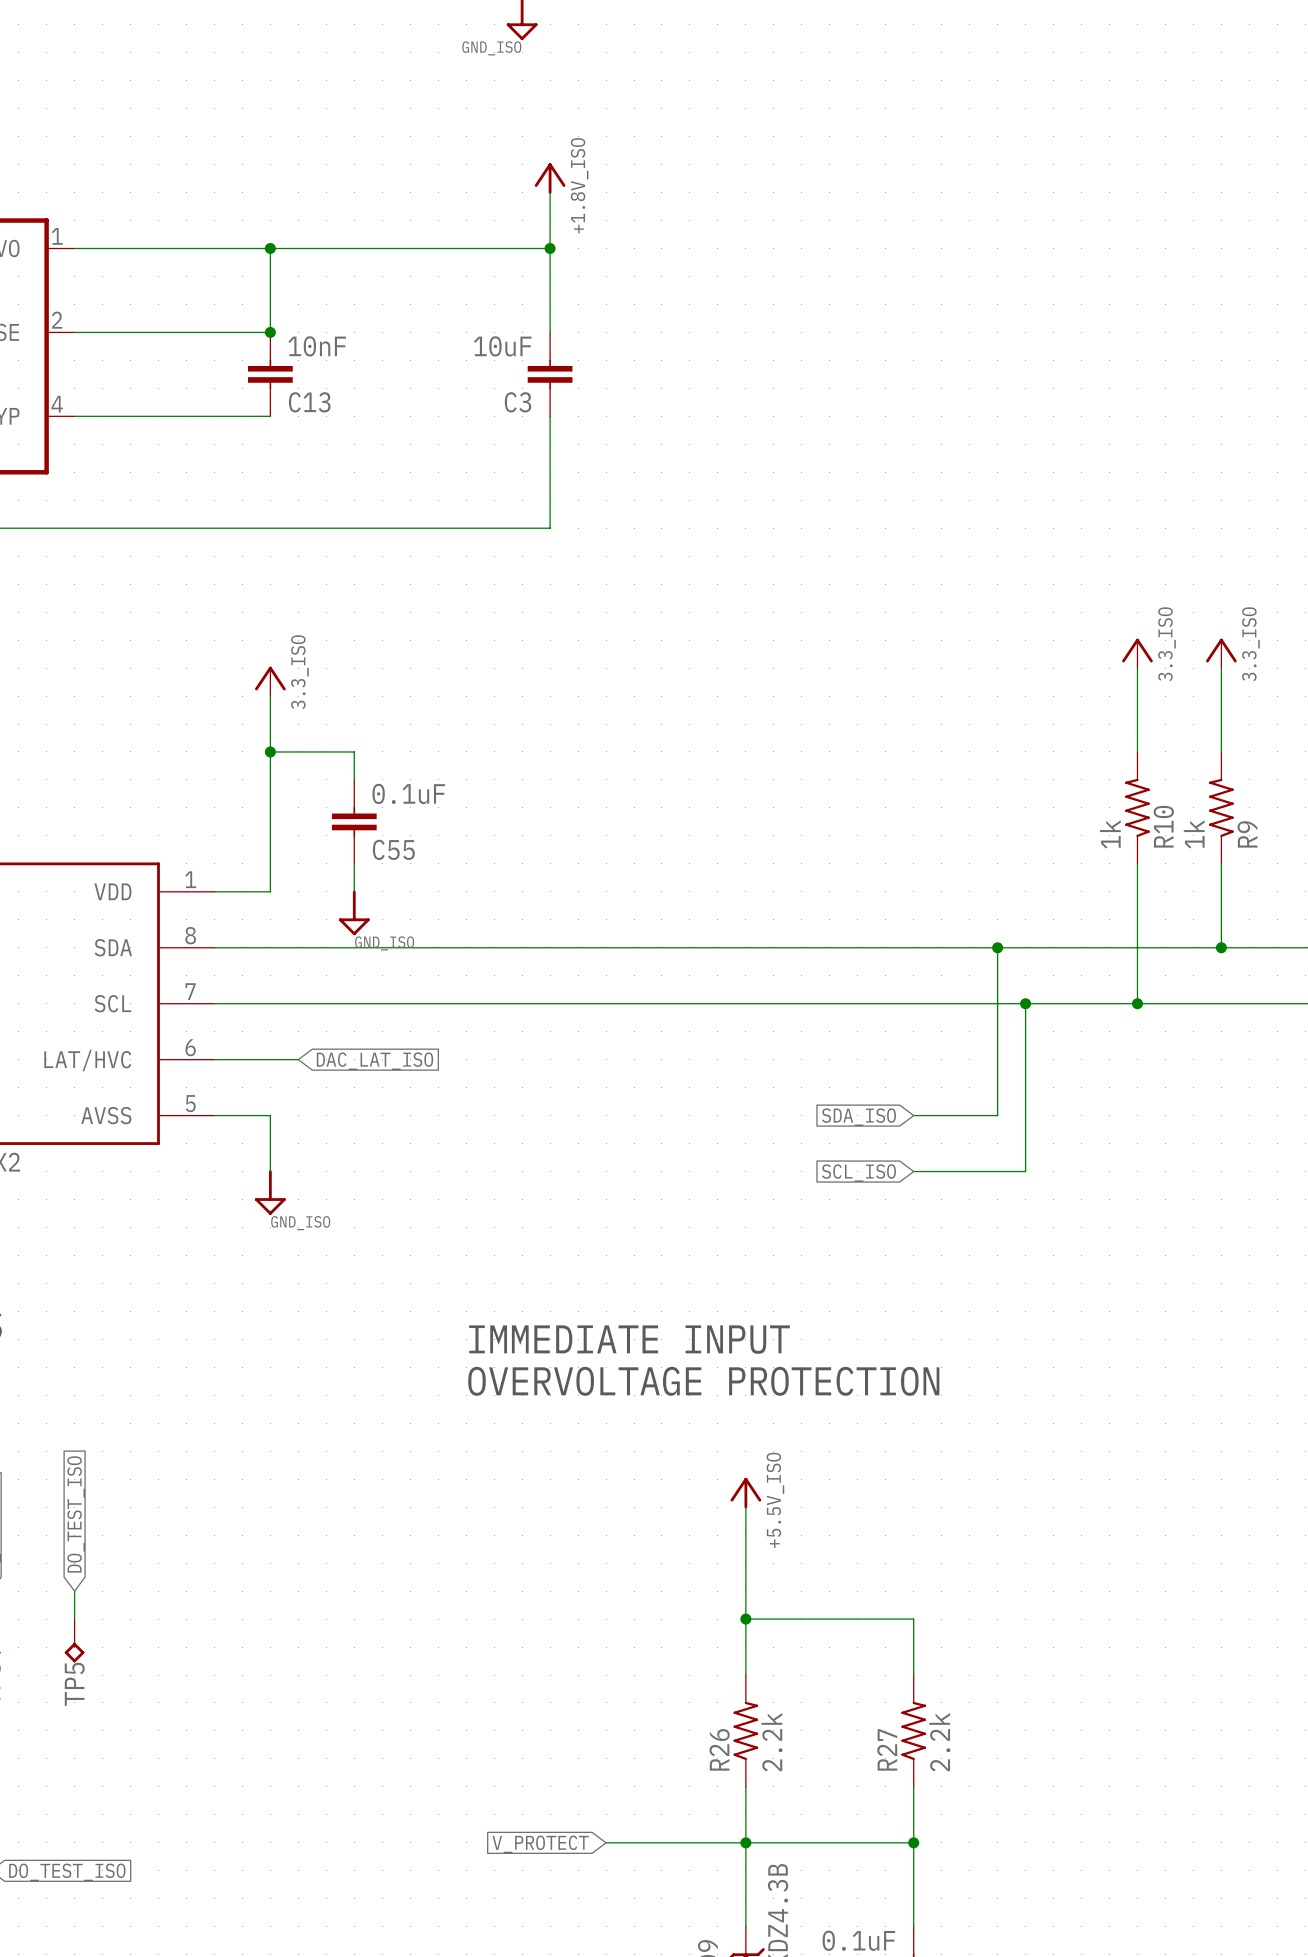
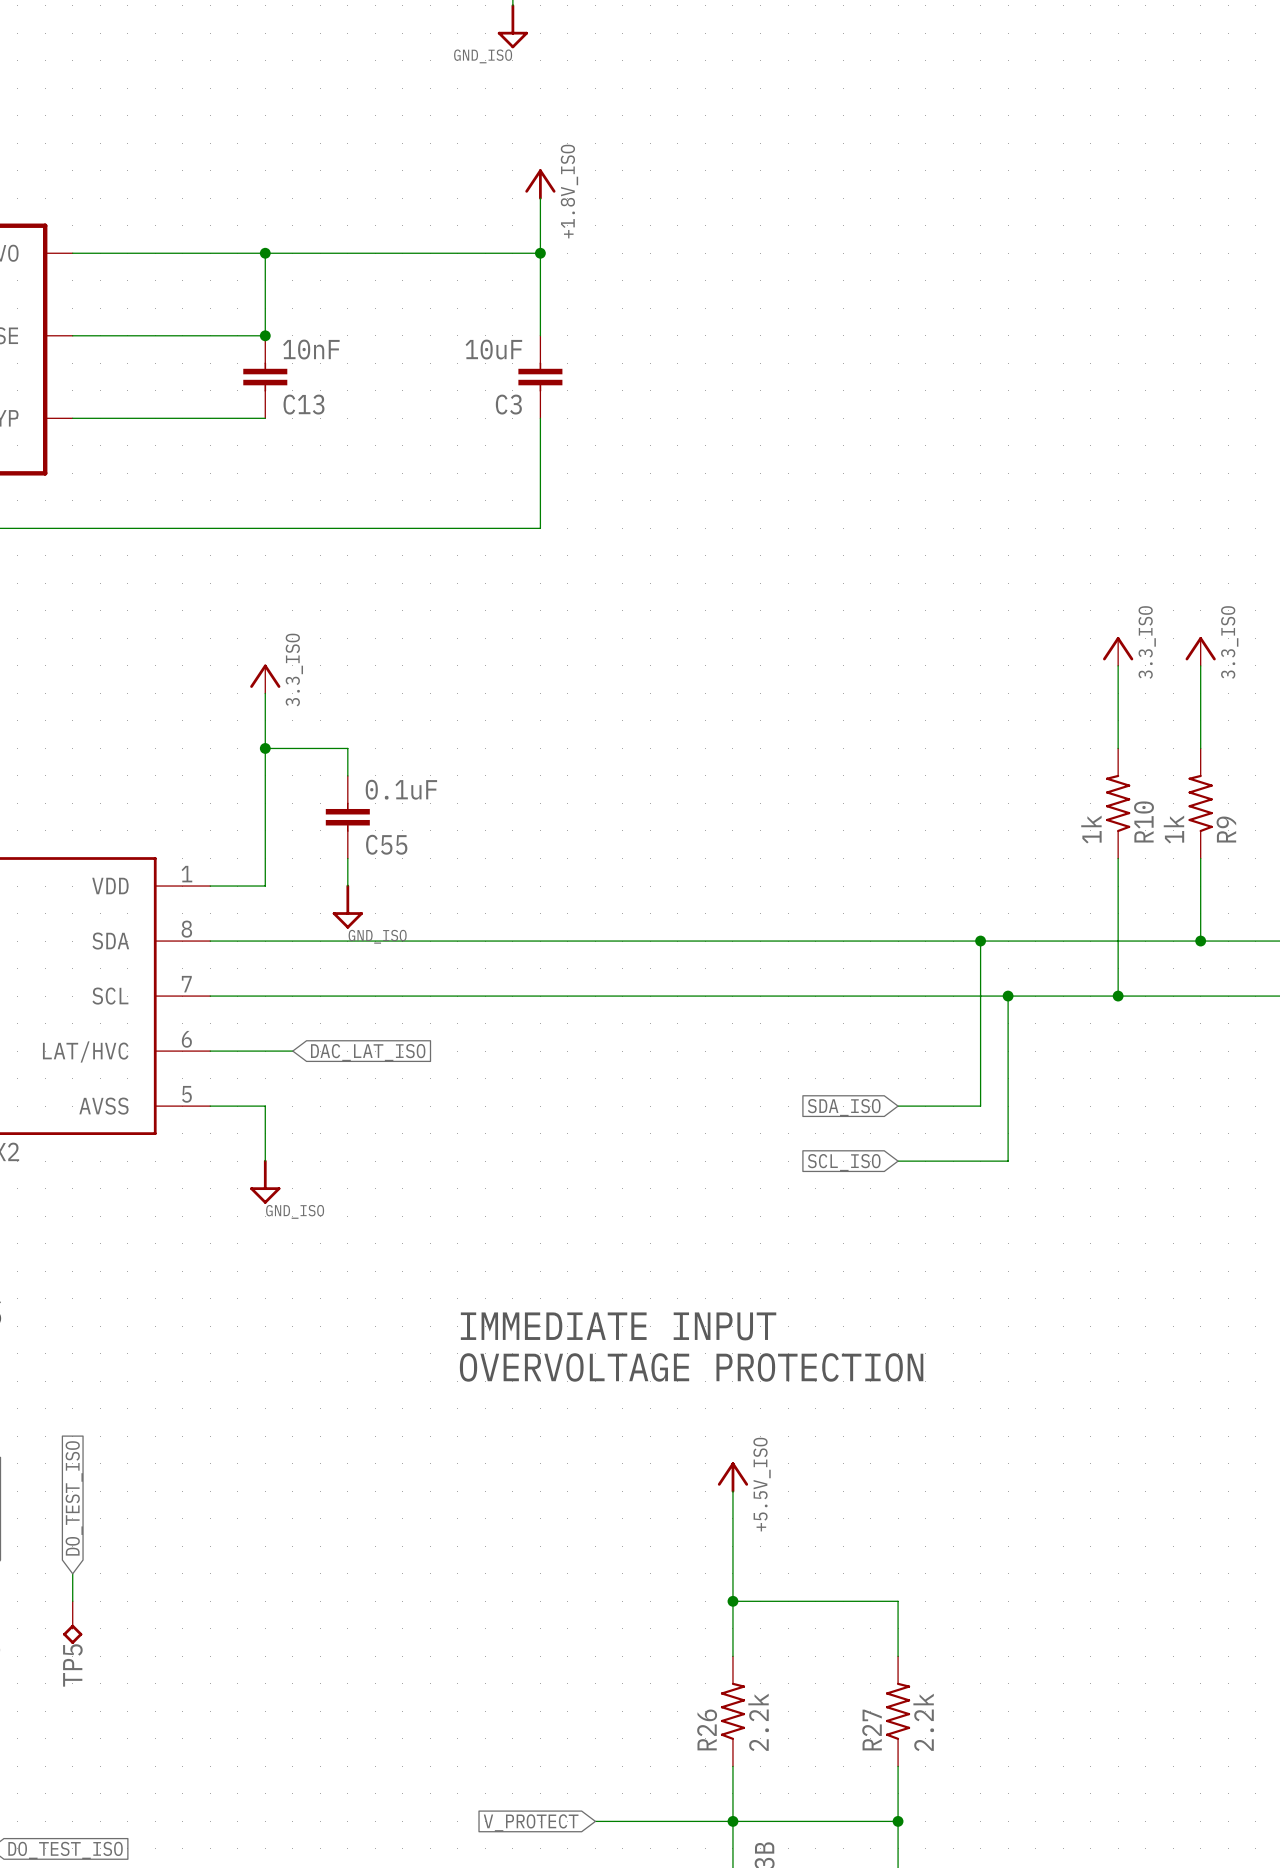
part pin number: 1 (57, 236) -> none
part pin number: 2 (57, 320) -> none
part pin number: 4 (57, 404) -> none

